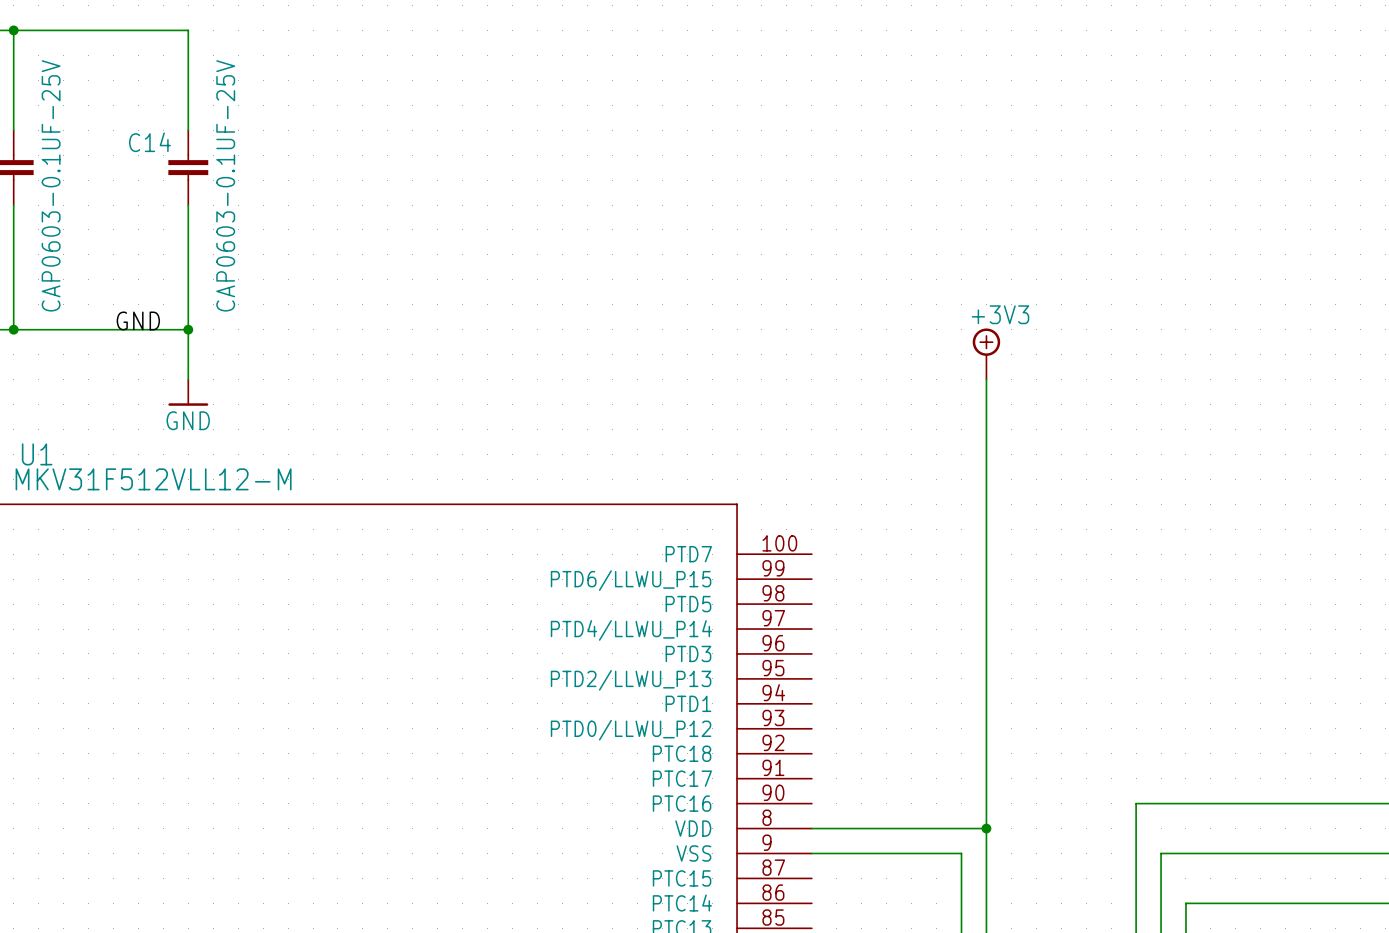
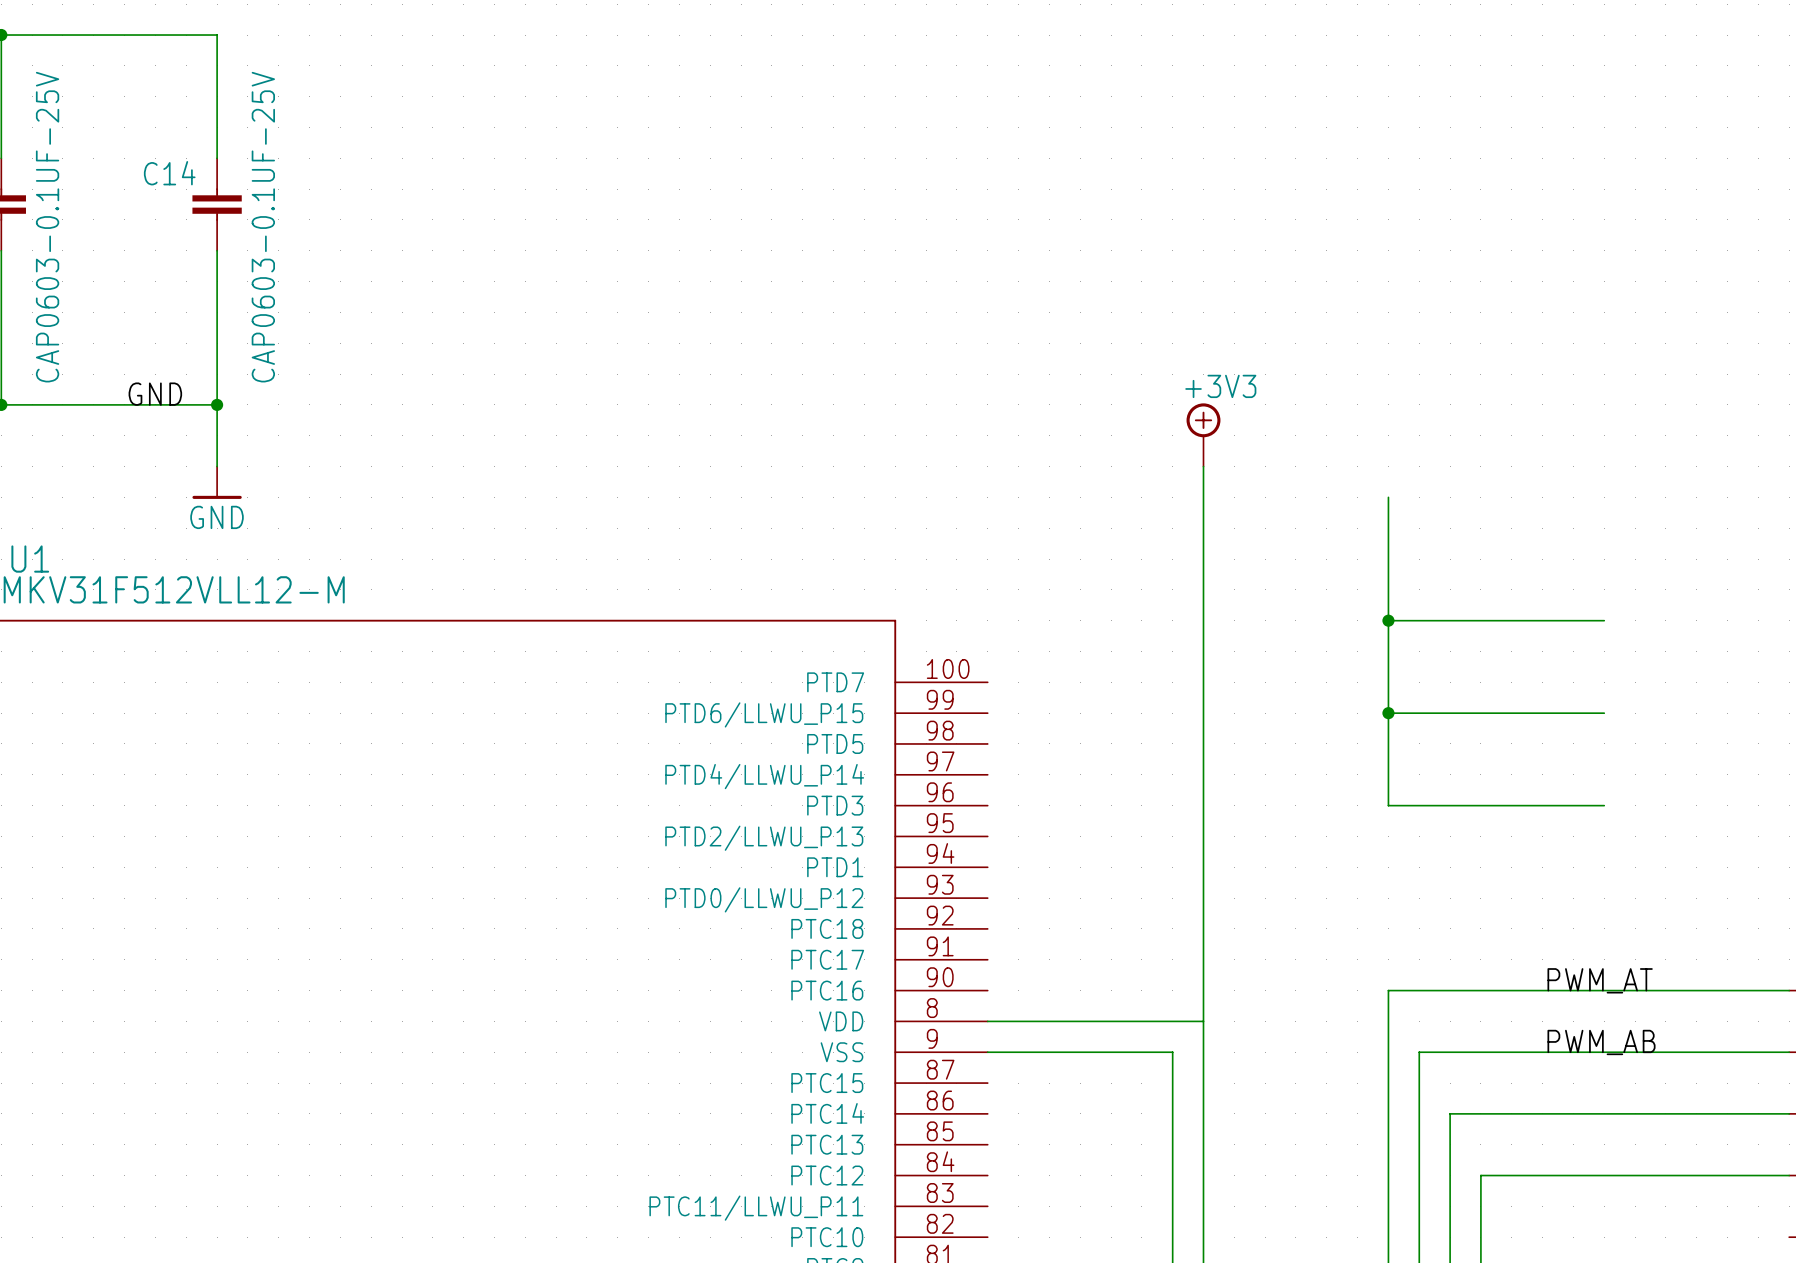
wire: none -> (1388, 497) (1388, 805) (1604, 805)
wire: none -> (1388, 620) (1604, 620)
junction: none -> (1388, 620)
wire: none -> (1388, 713) (1604, 713)
junction: none -> (1388, 713)
label: none -> PWM_AT (1600, 980)
junction: (986, 828) -> none
label: none -> PWM_AB (1601, 1042)

